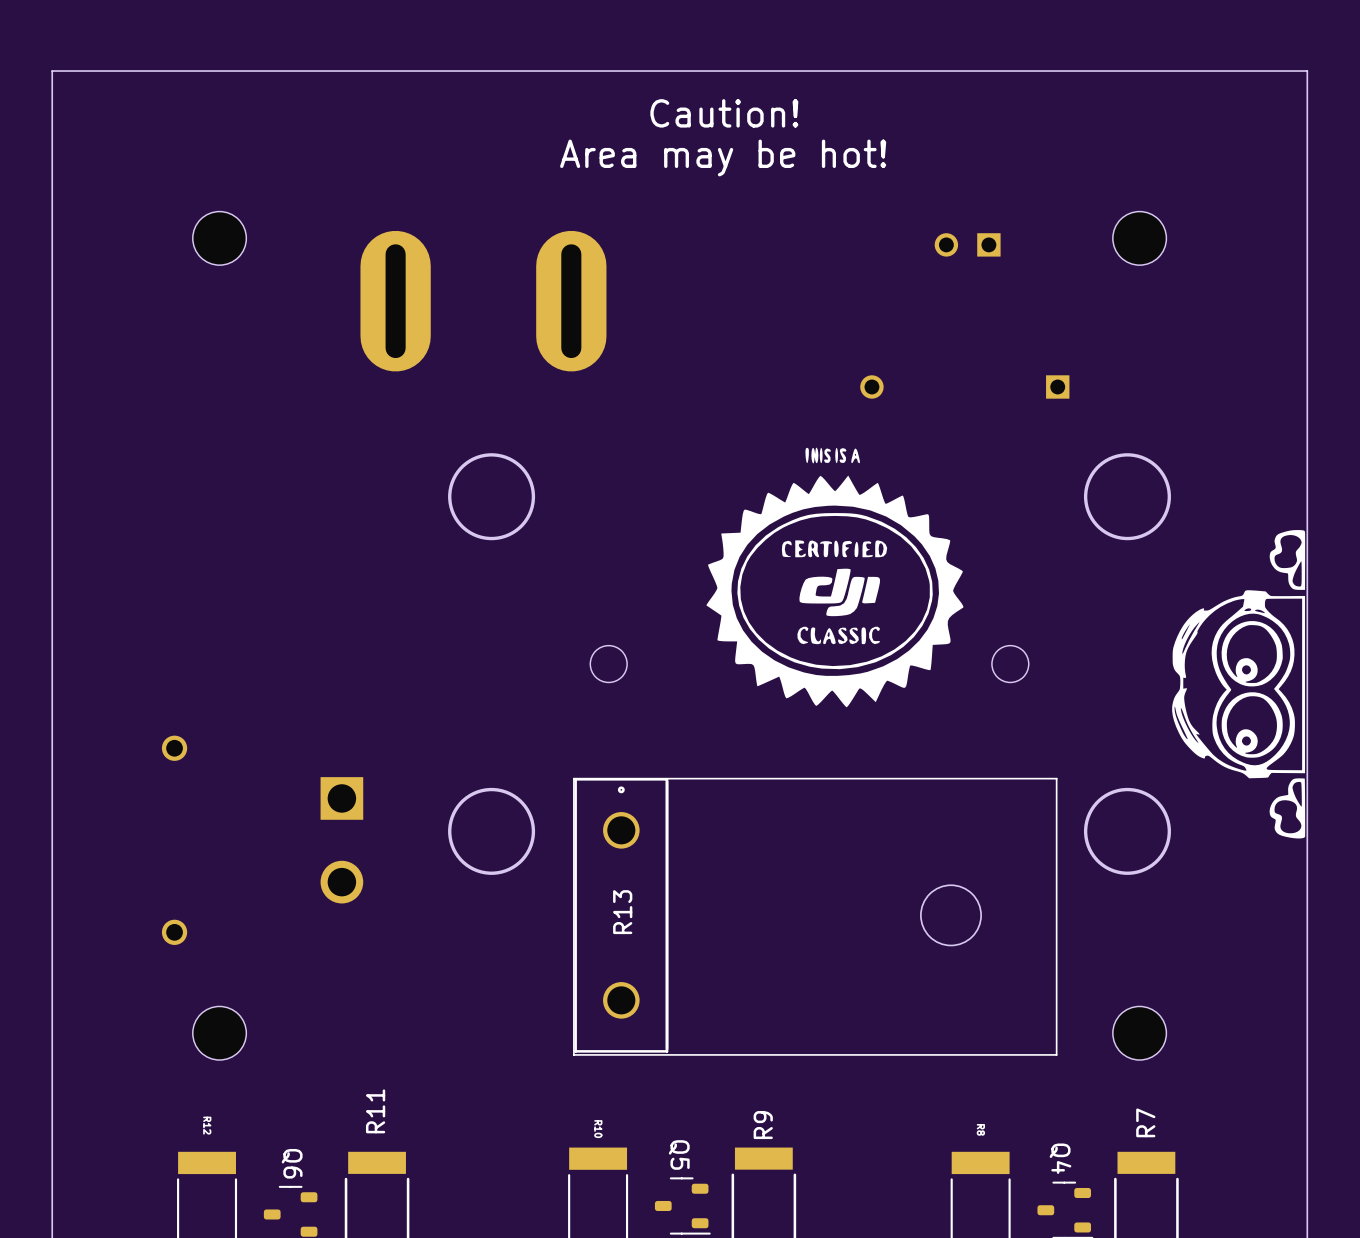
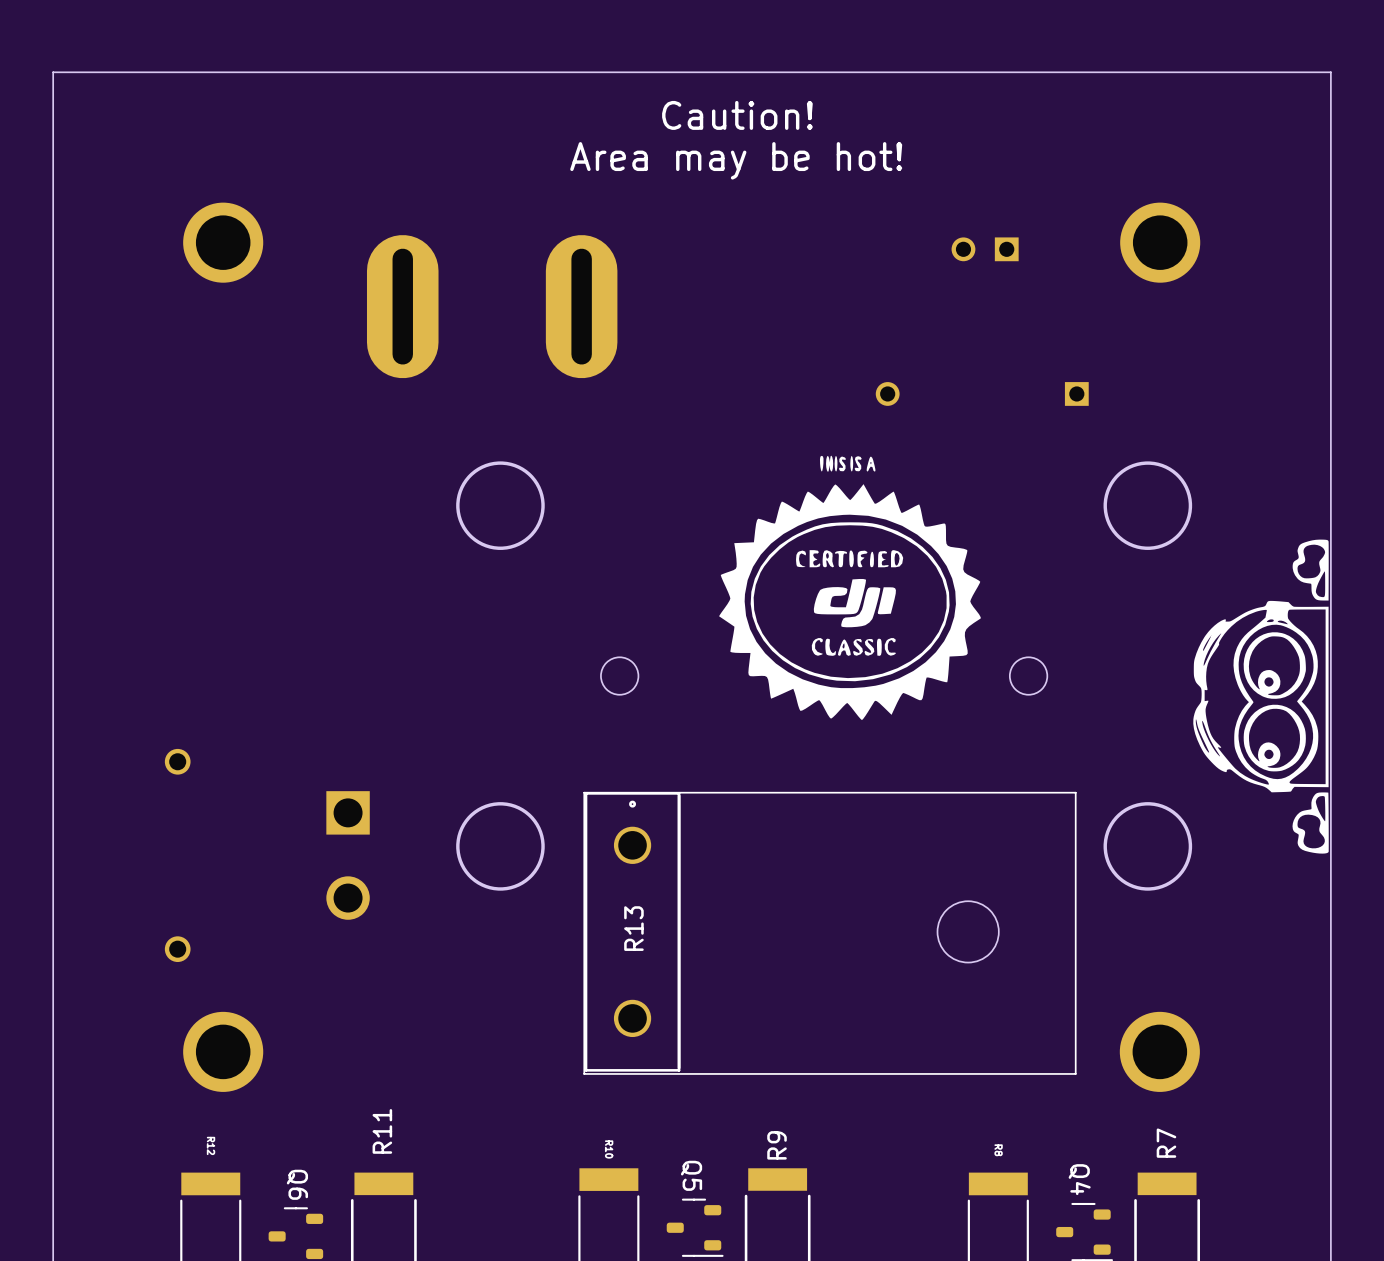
part footprint: [192, 211, 247, 266] -> [183, 202, 264, 283]
part footprint: [1112, 211, 1167, 266] -> [1120, 202, 1201, 283]
part footprint: [192, 1006, 247, 1061] -> [183, 1011, 264, 1092]
part footprint: [1112, 1006, 1167, 1061] -> [1119, 1011, 1200, 1092]

